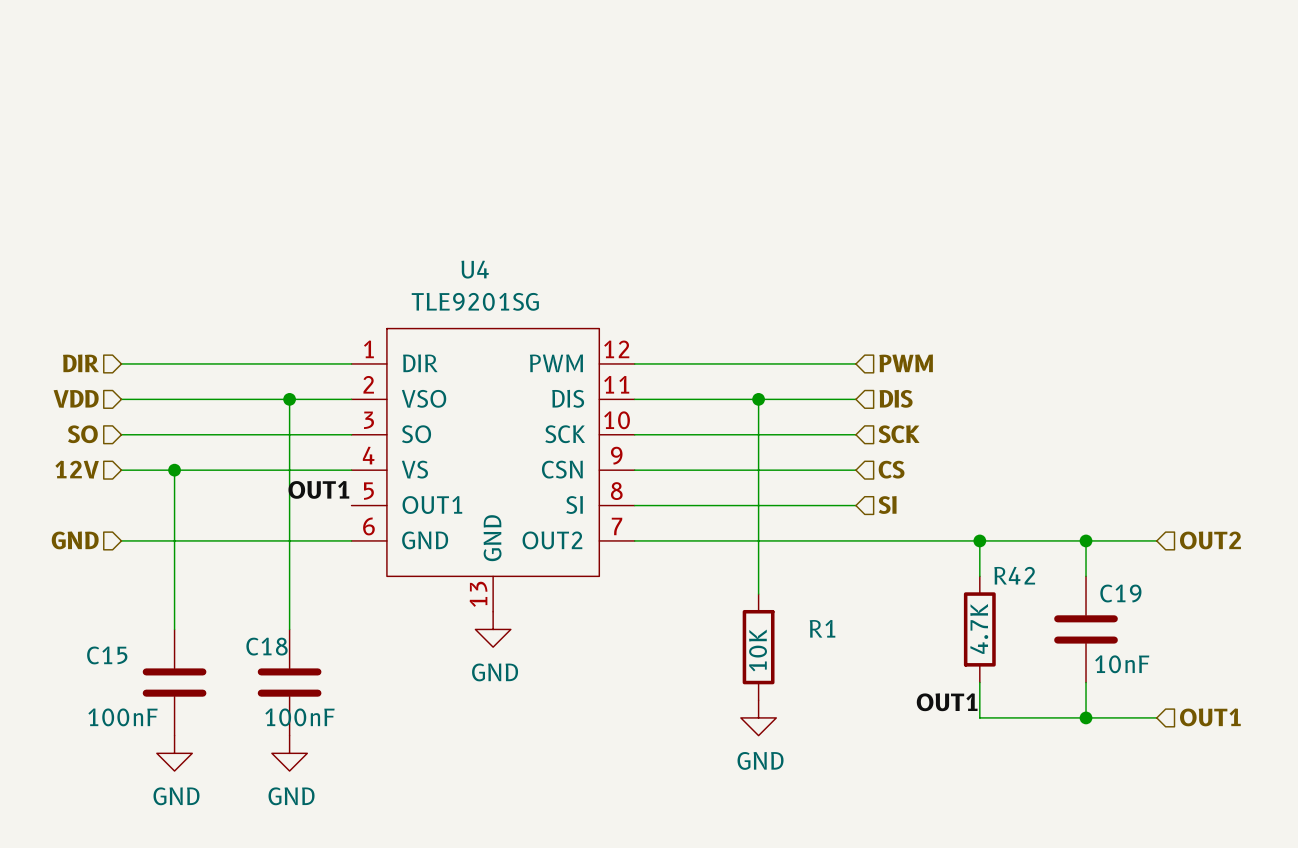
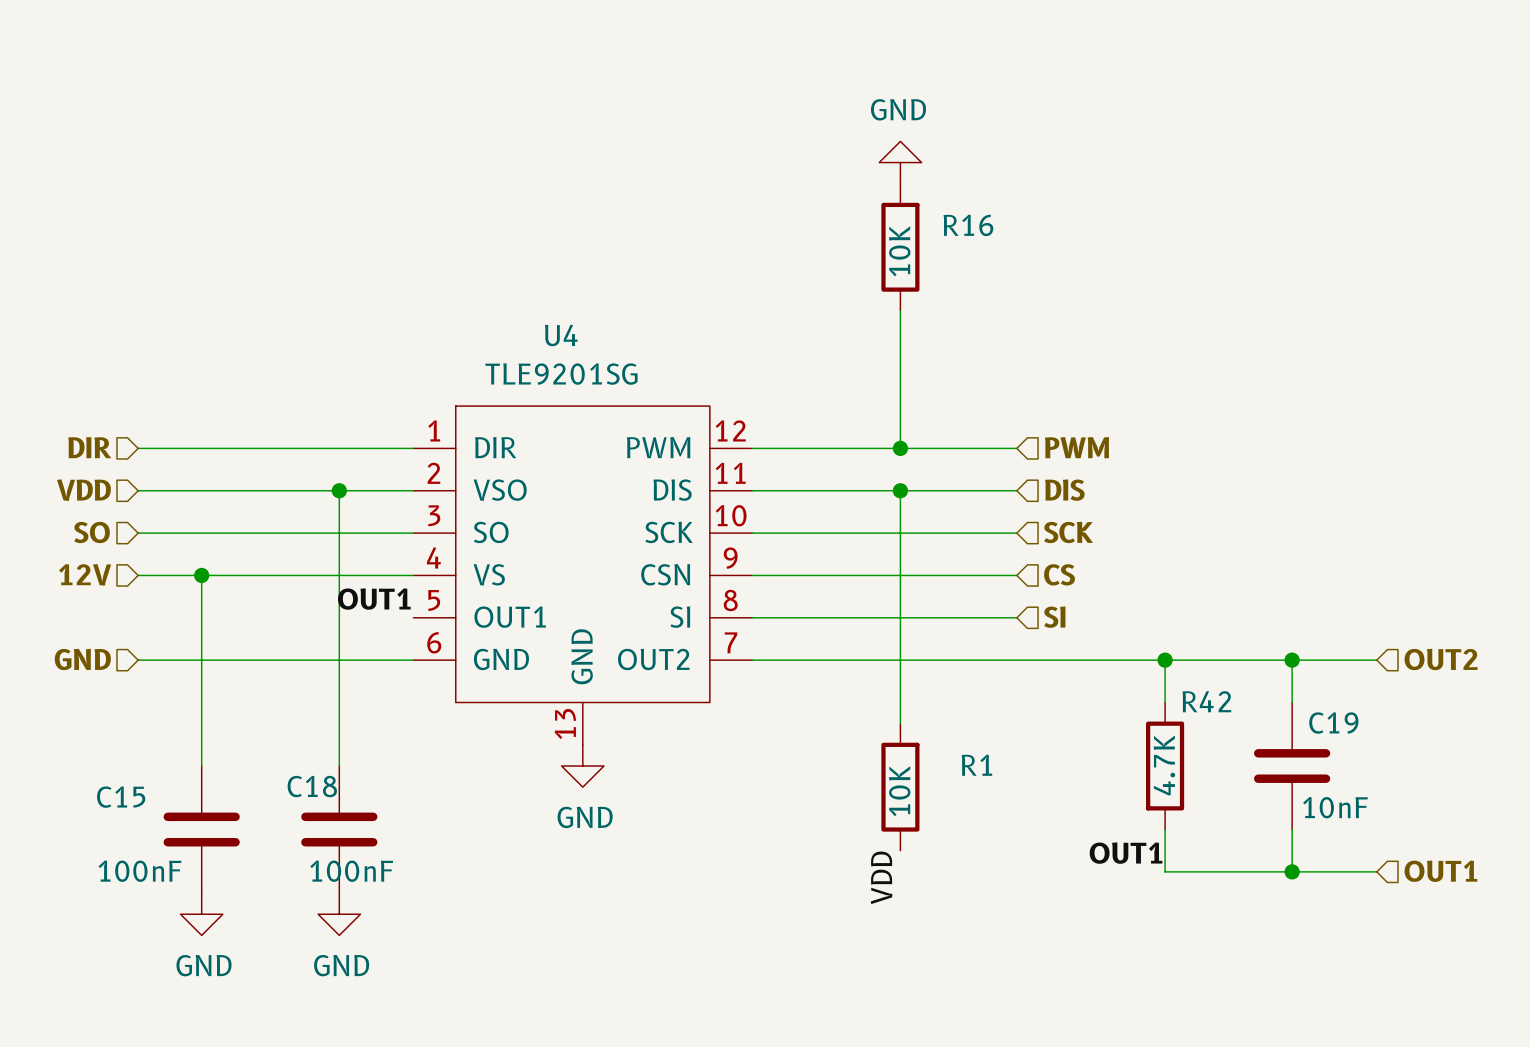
power symbol: none -> GND (900, 162)
R16: none -> 10K (900, 247)
wire: none -> (900, 310) (900, 448)
junction: none -> (900, 448)
power symbol: GND (758, 717) -> none
label: none -> VDD (881, 877)

